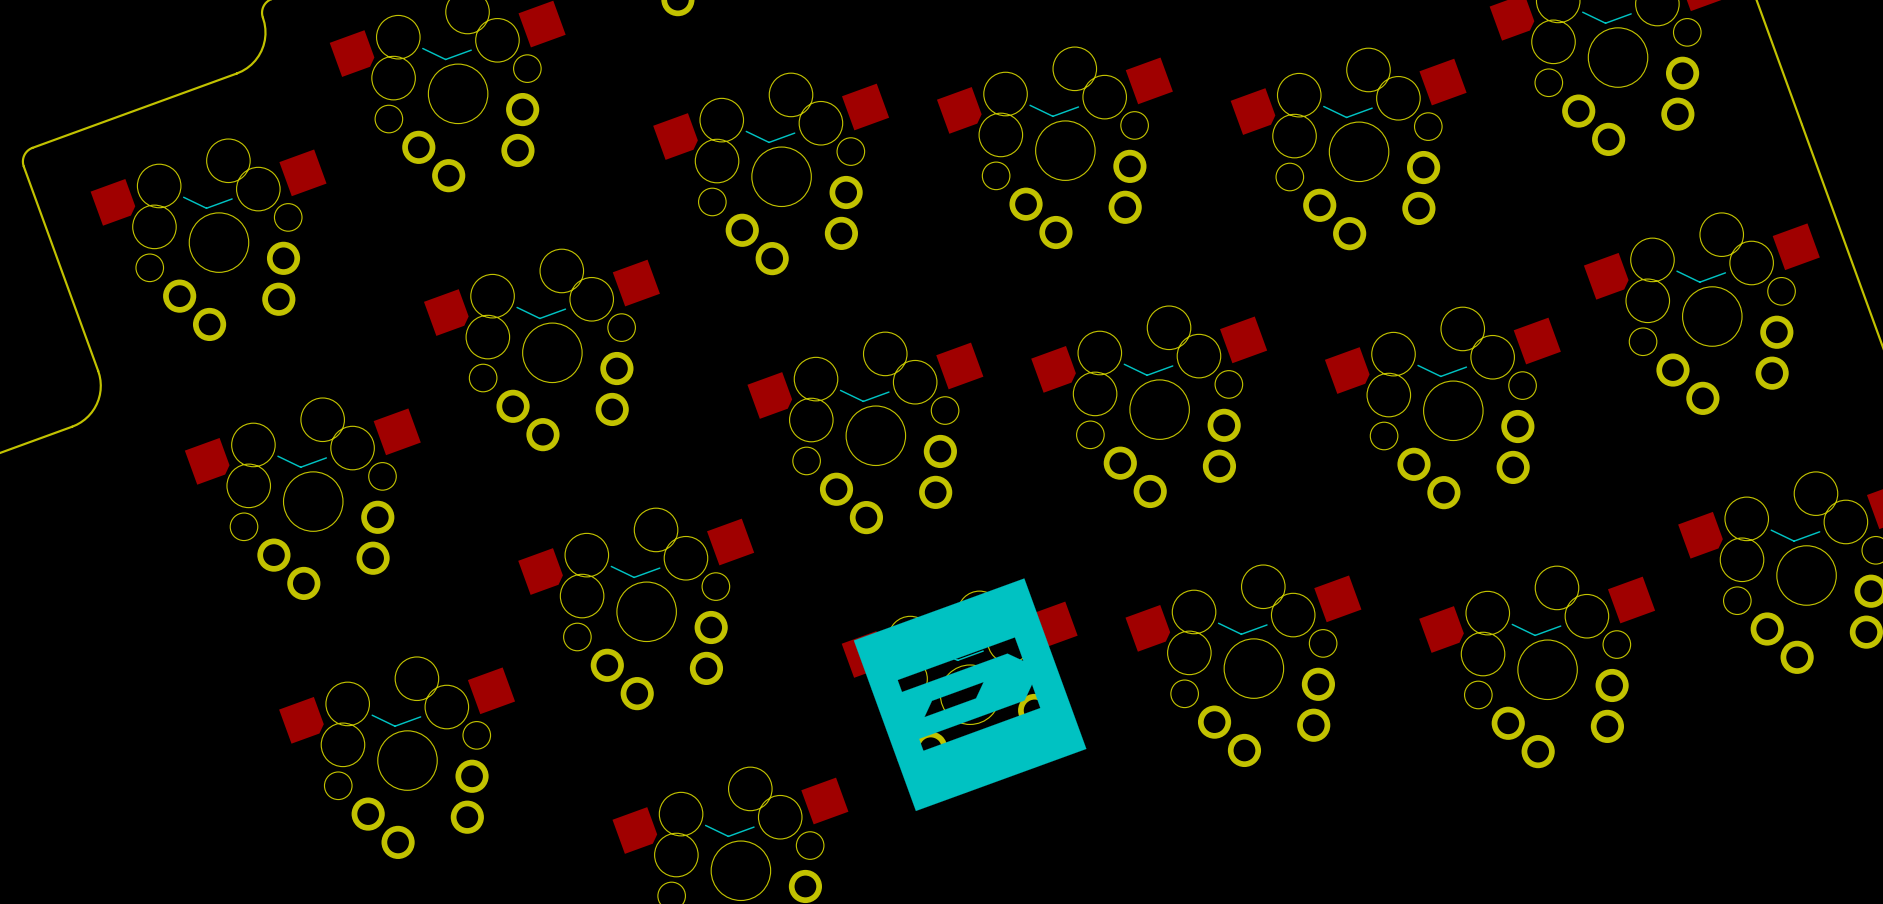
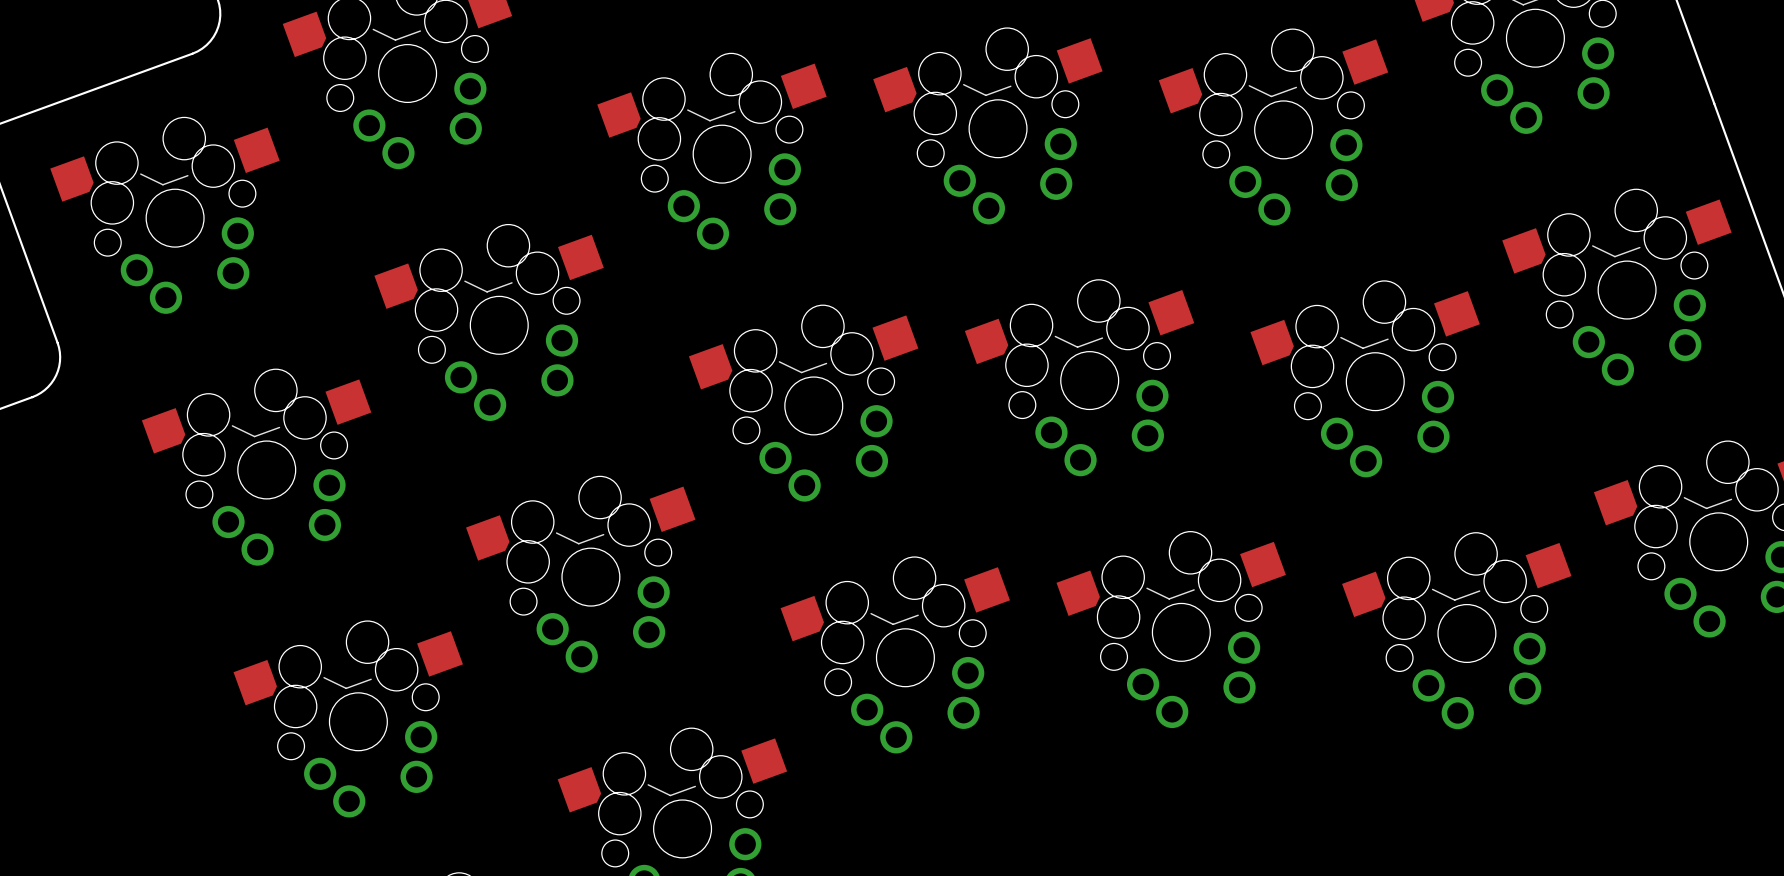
drawing: [853, 578, 1087, 812] -> none

